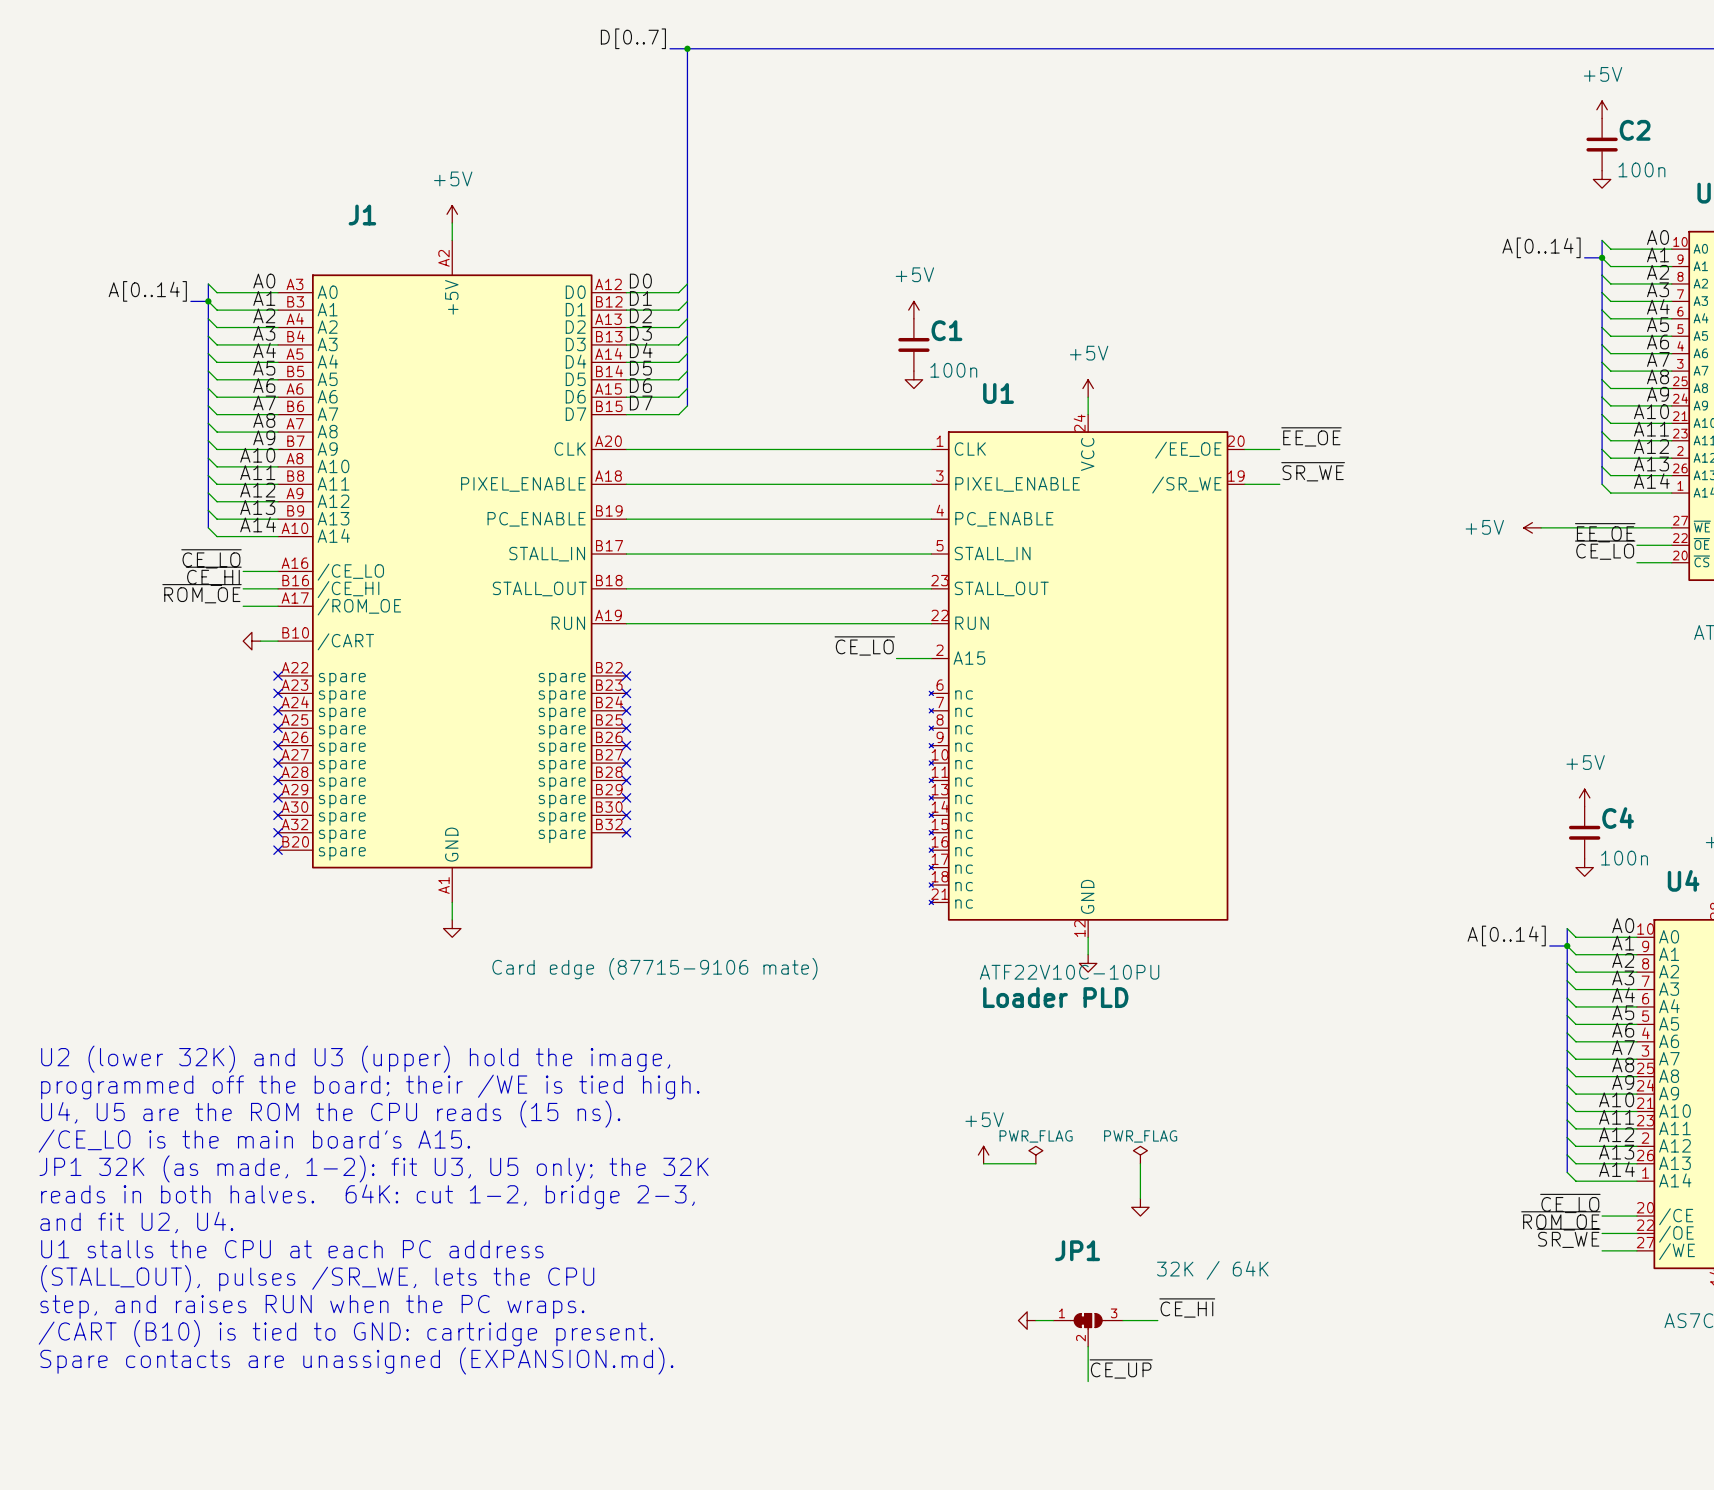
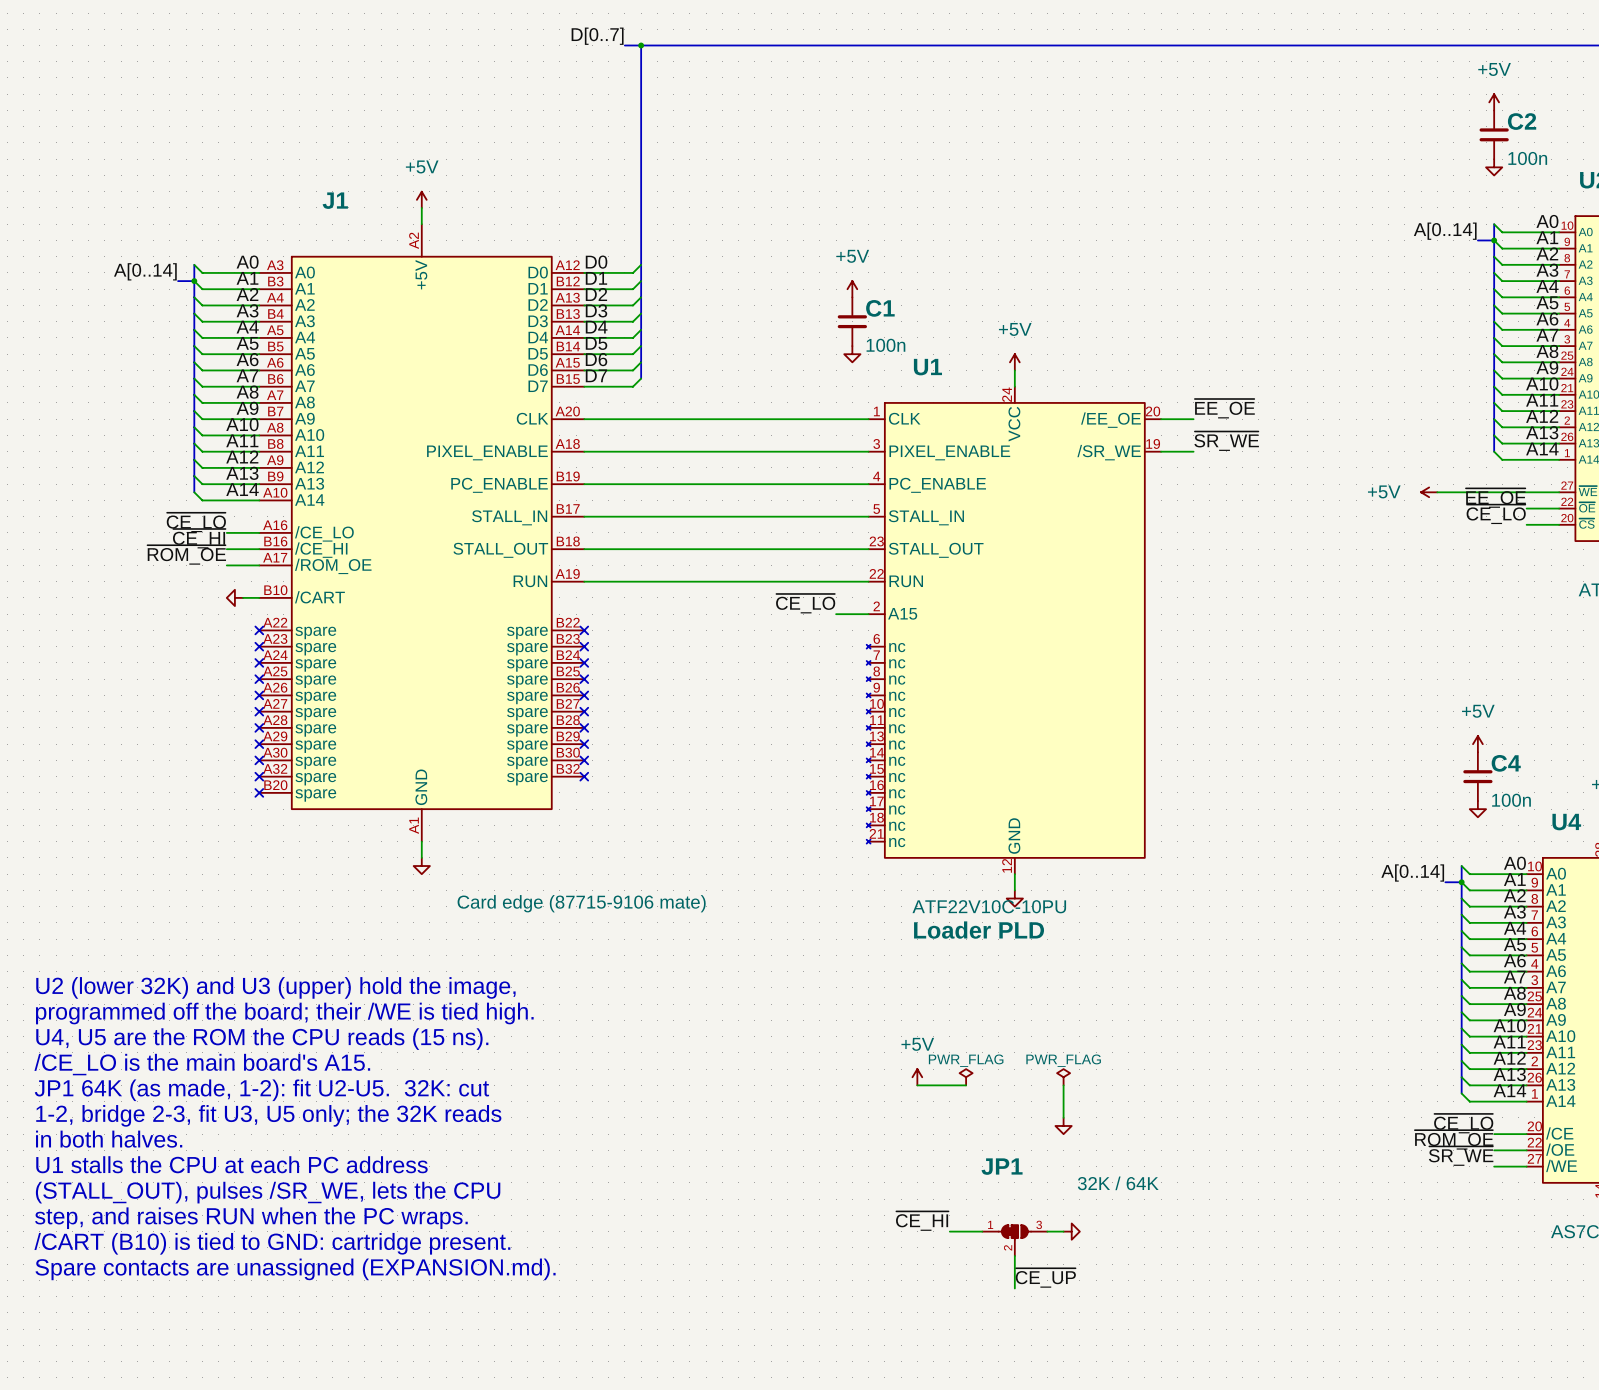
text: JP1 32K (as made, 1-2): fit U3, U5 only; the 32K (374, 1168) -> JP1 64K (as made, 1-2): fit U2-U5. 32K: cut (261, 1090)
text: reads in both halves. 64K: cut 1-2, bridge 2-3, (367, 1196) -> 1-2, bridge 2-3, fit U3, U5 only; the 32K reads (268, 1115)
text: and fit U2, U4. (136, 1222) -> in both halves. (109, 1139)
label position: ~{CE_HI} (1187, 1307) -> ~{CE_HI} (922, 1221)
power symbol rotation: 0° (1027, 1320) -> 180° (1071, 1231)
power symbol position: (1027, 1320) -> (1071, 1231)

